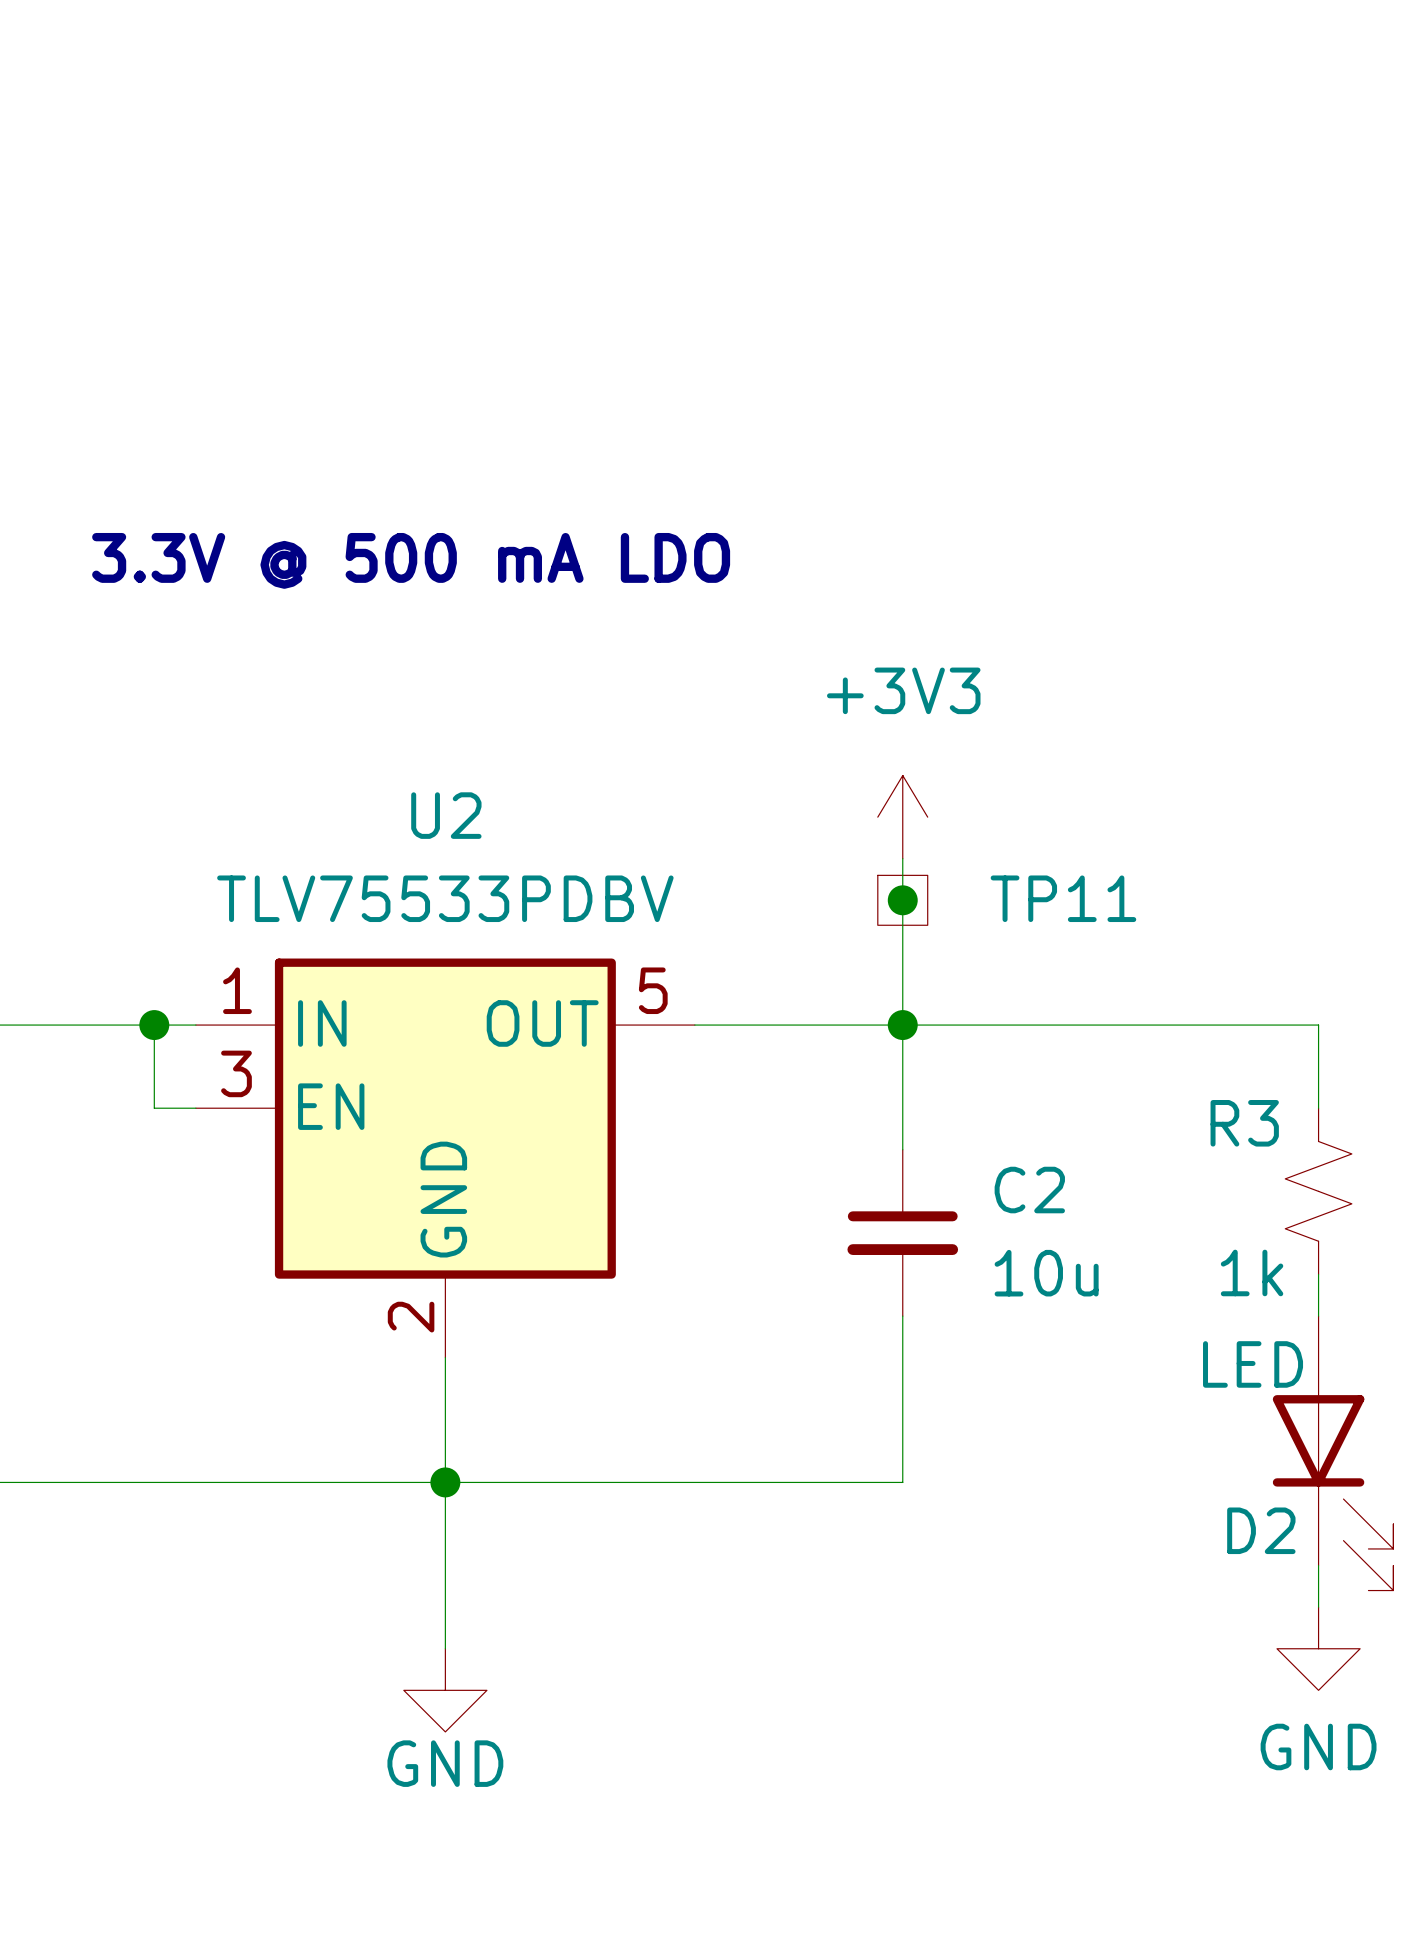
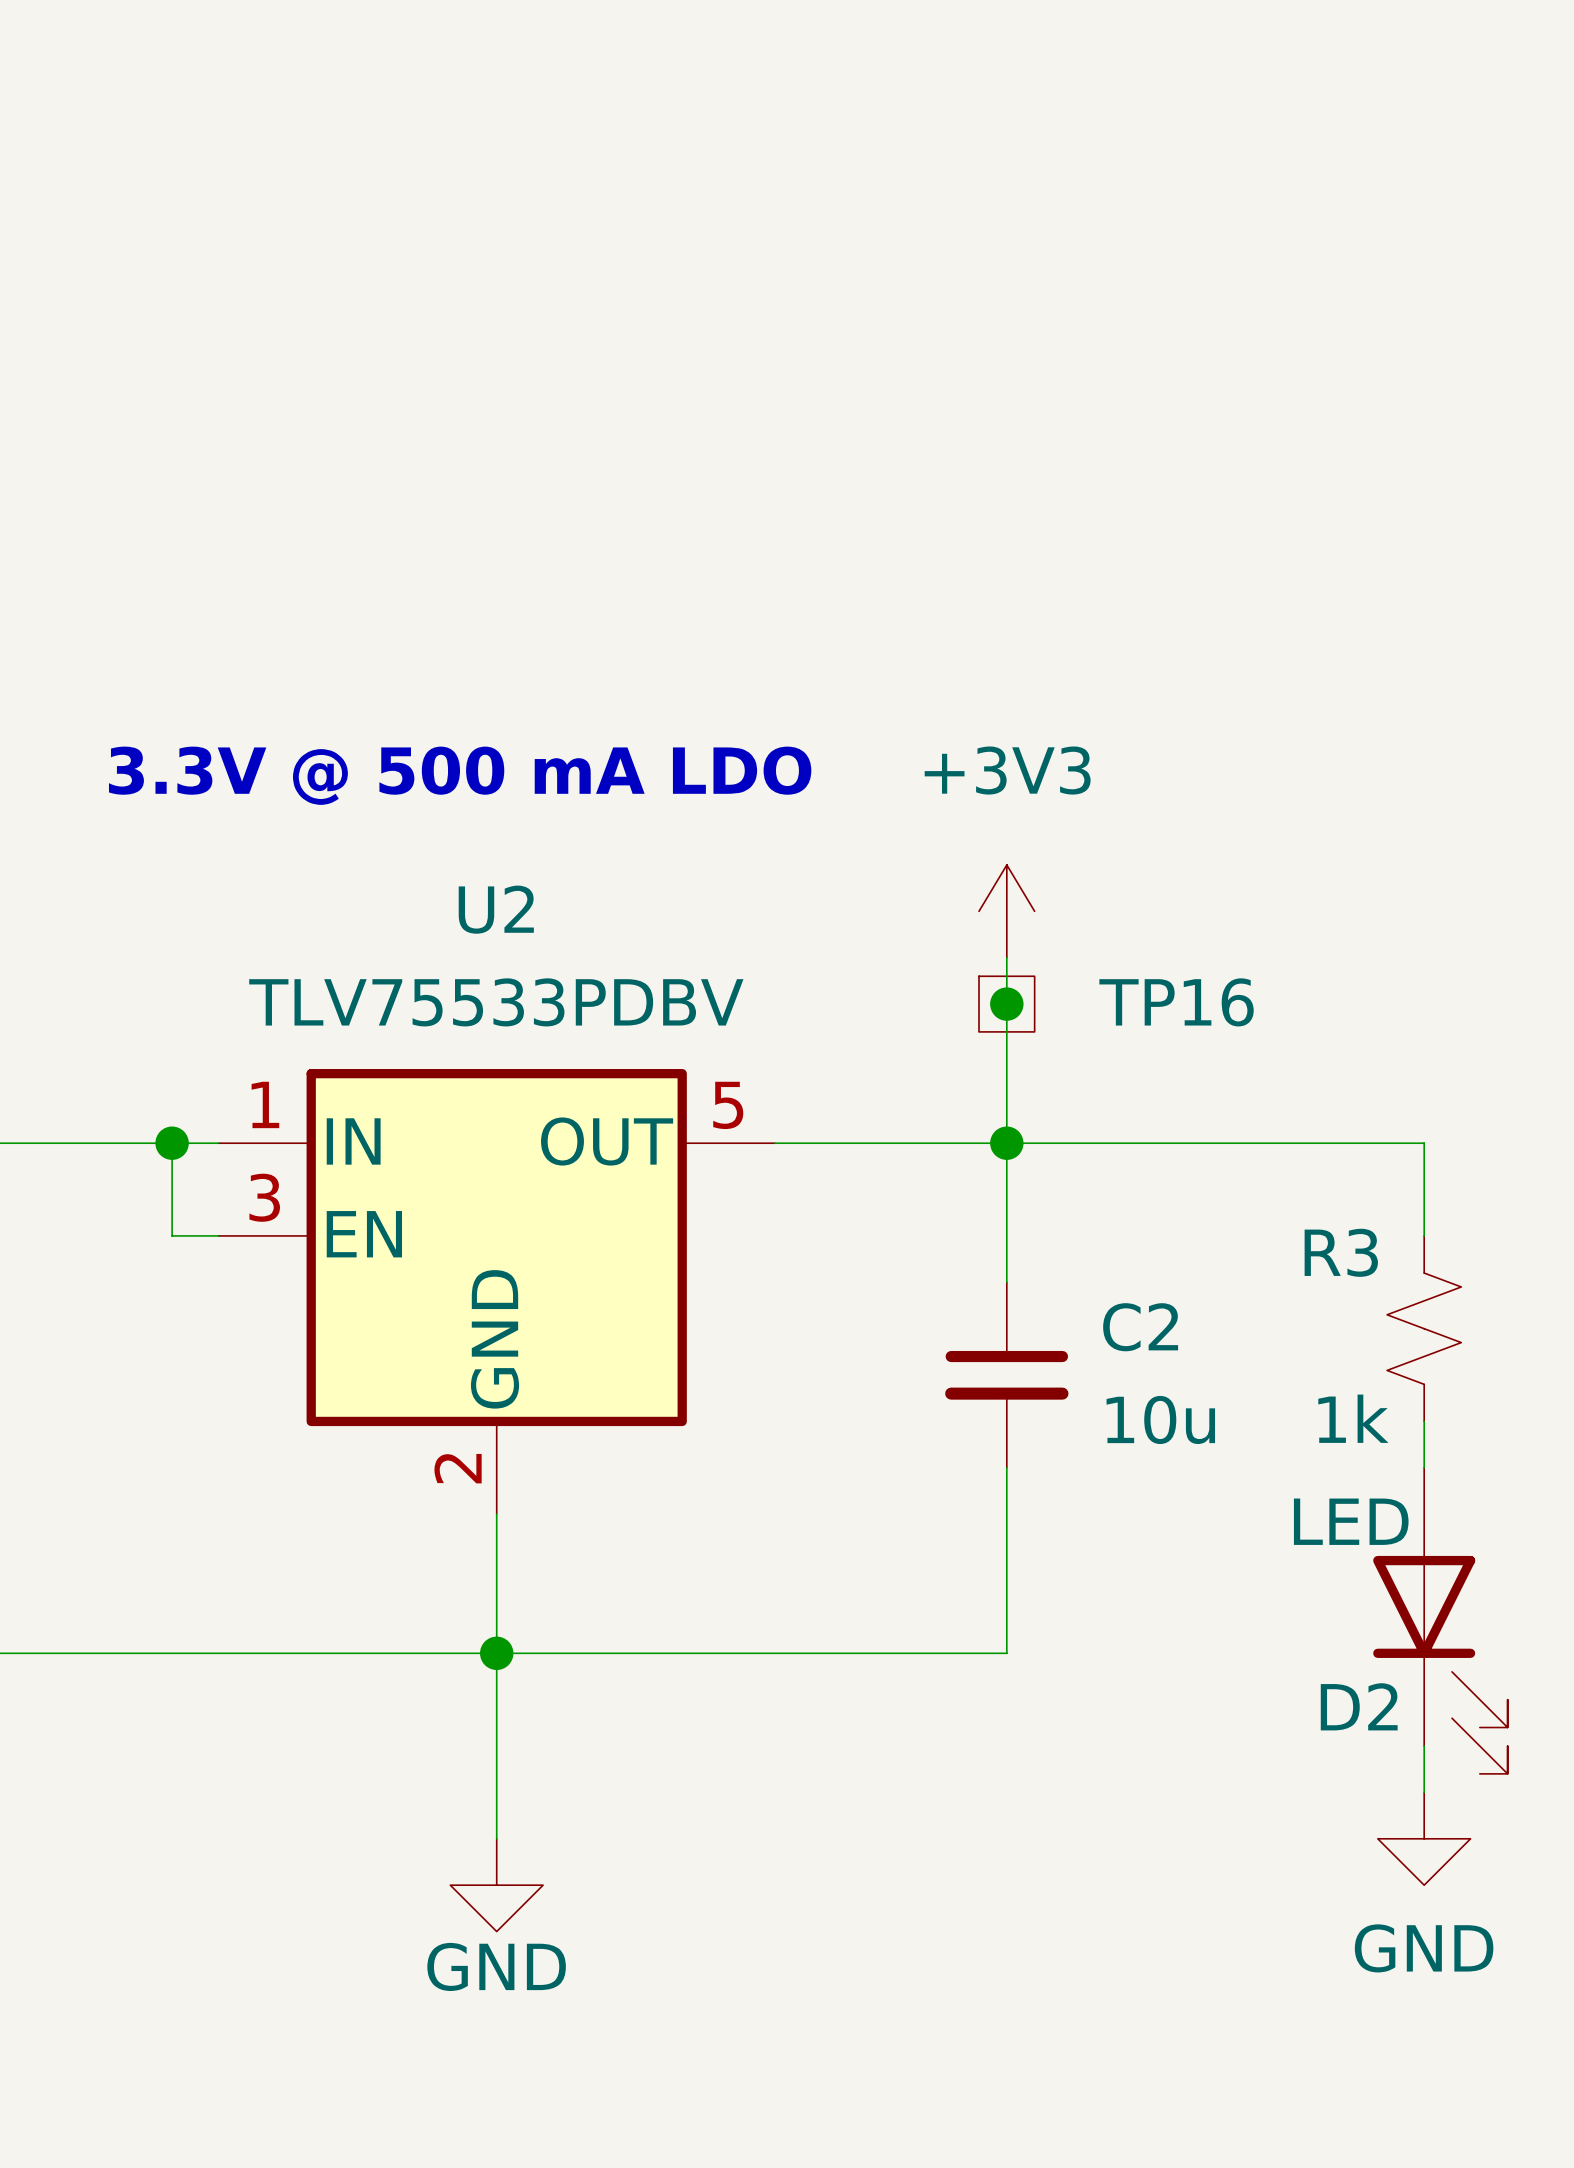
text position: 3.3V @ 500 mA LDO (411, 560) -> 3.3V @ 500 mA LDO (460, 775)
TP11 name: TP11 (1063, 898) -> TP16 (1176, 1002)
wire: (1276, 1025) (1318, 1025) (1318, 1108) -> (1424, 1143) (1424, 1235)
R3 position: (1318, 1191) -> (1424, 1328)
wire: (1318, 1274) (1318, 1316) -> (1424, 1421) (1424, 1467)
D2 position: (1333, 1453) -> (1440, 1620)
wire: (1318, 1565) (1318, 1607) -> (1424, 1746) (1424, 1792)
power symbol position: GND (1318, 1648) -> GND (1424, 1838)

